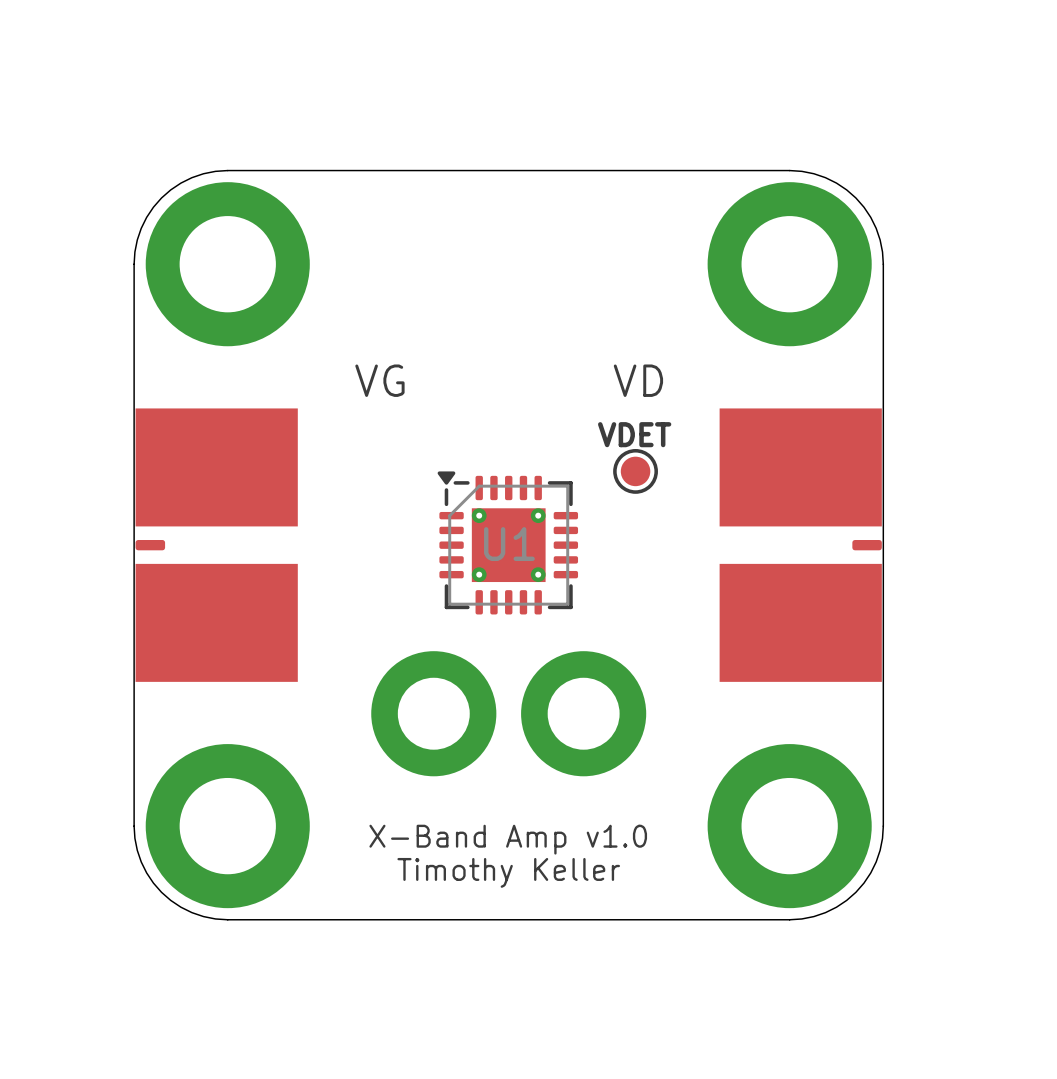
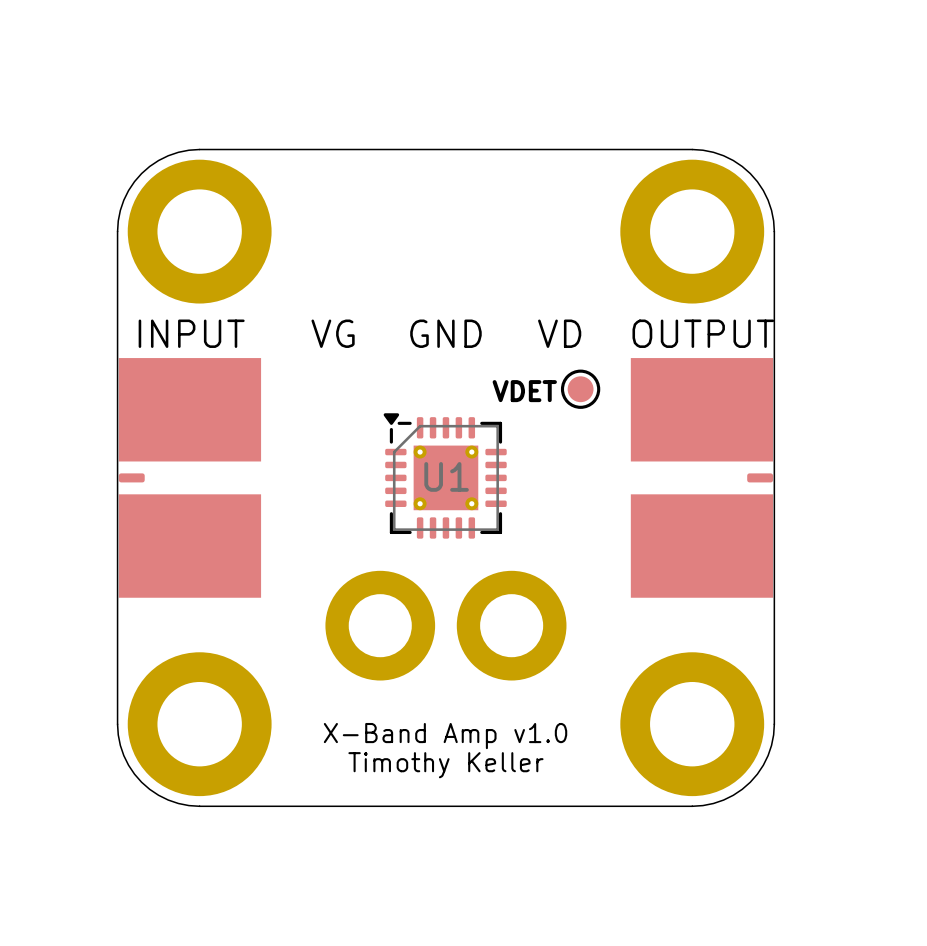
text: none -> INPUT (191, 333)
text: none -> GND (445, 333)
text: none -> OUTPUT (703, 333)
text position: VDET (634, 434) -> VDET (524, 391)
part position: (635, 471) -> (580, 389)

